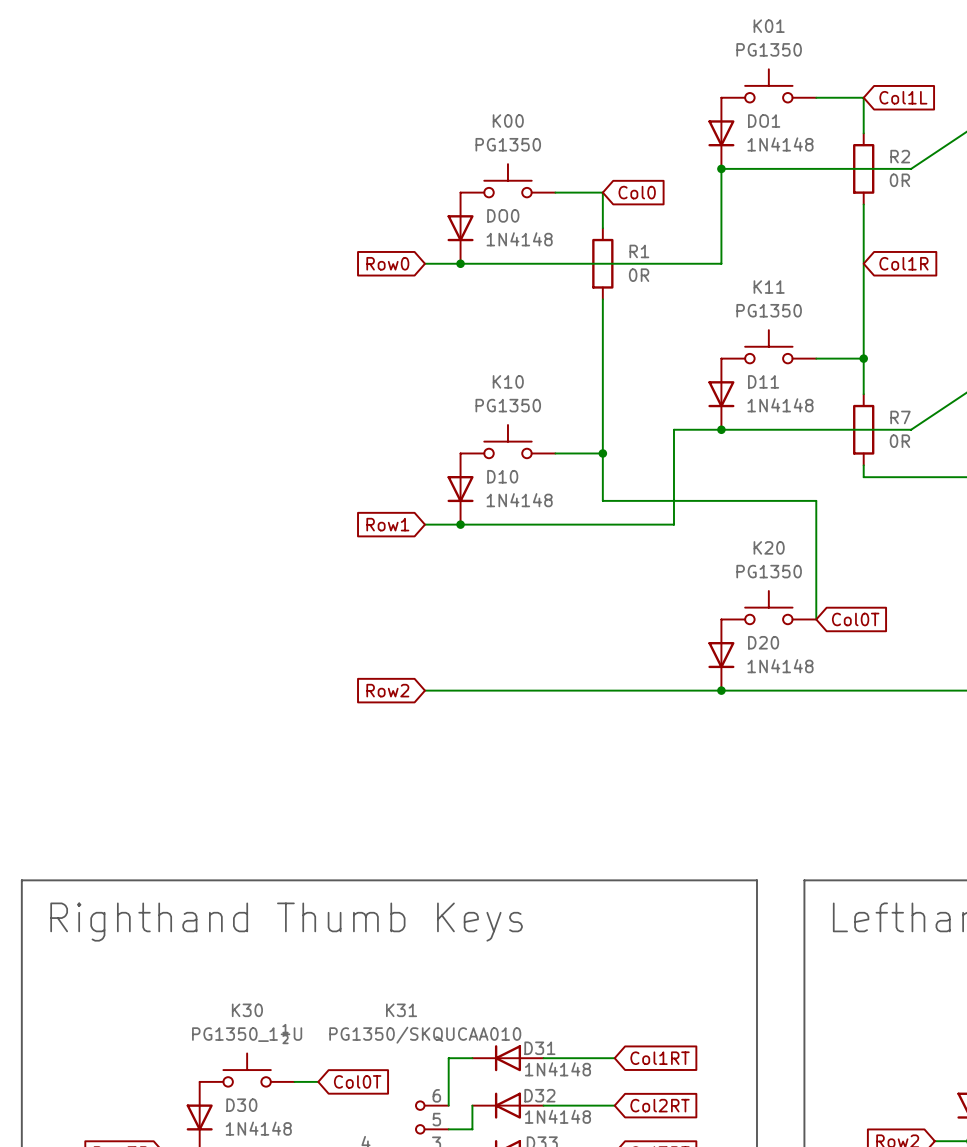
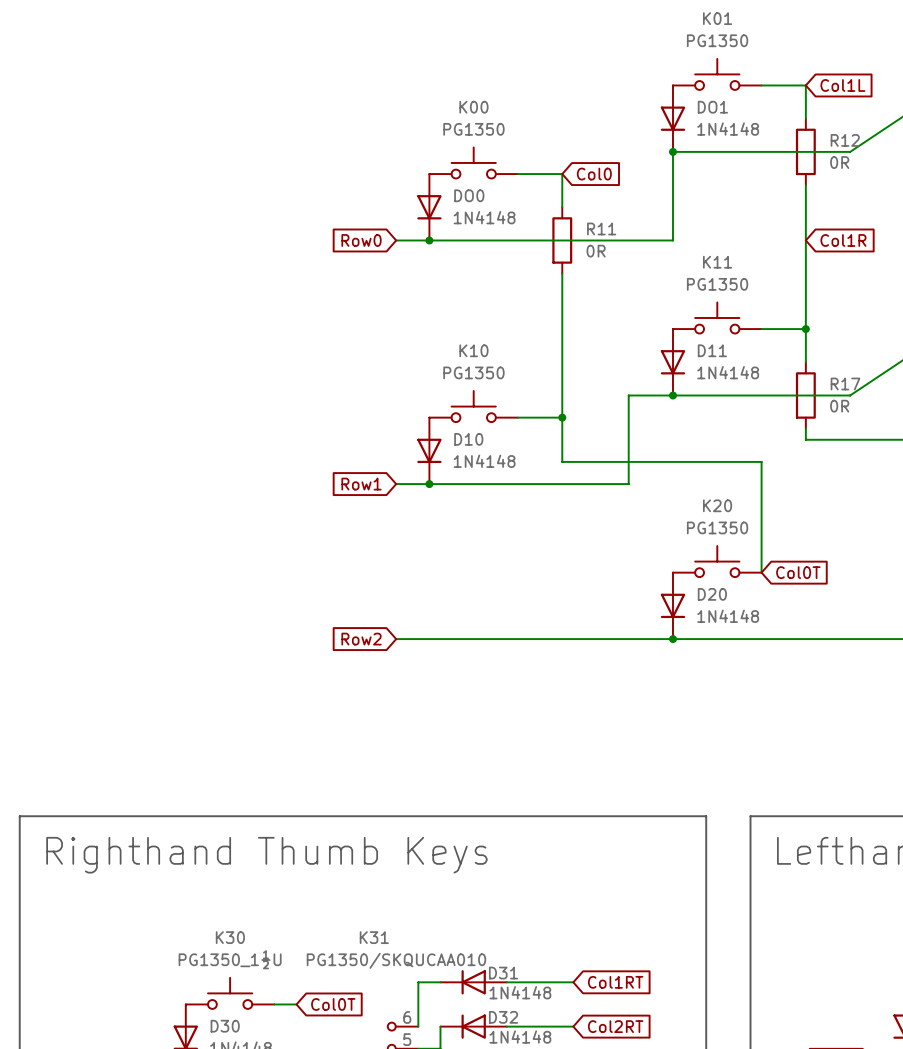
R2 name: R2 (900, 156) -> R12 (845, 140)
R1 name: R1 (639, 251) -> R11 (601, 228)
R7 name: R7 (900, 417) -> R17 (845, 384)

